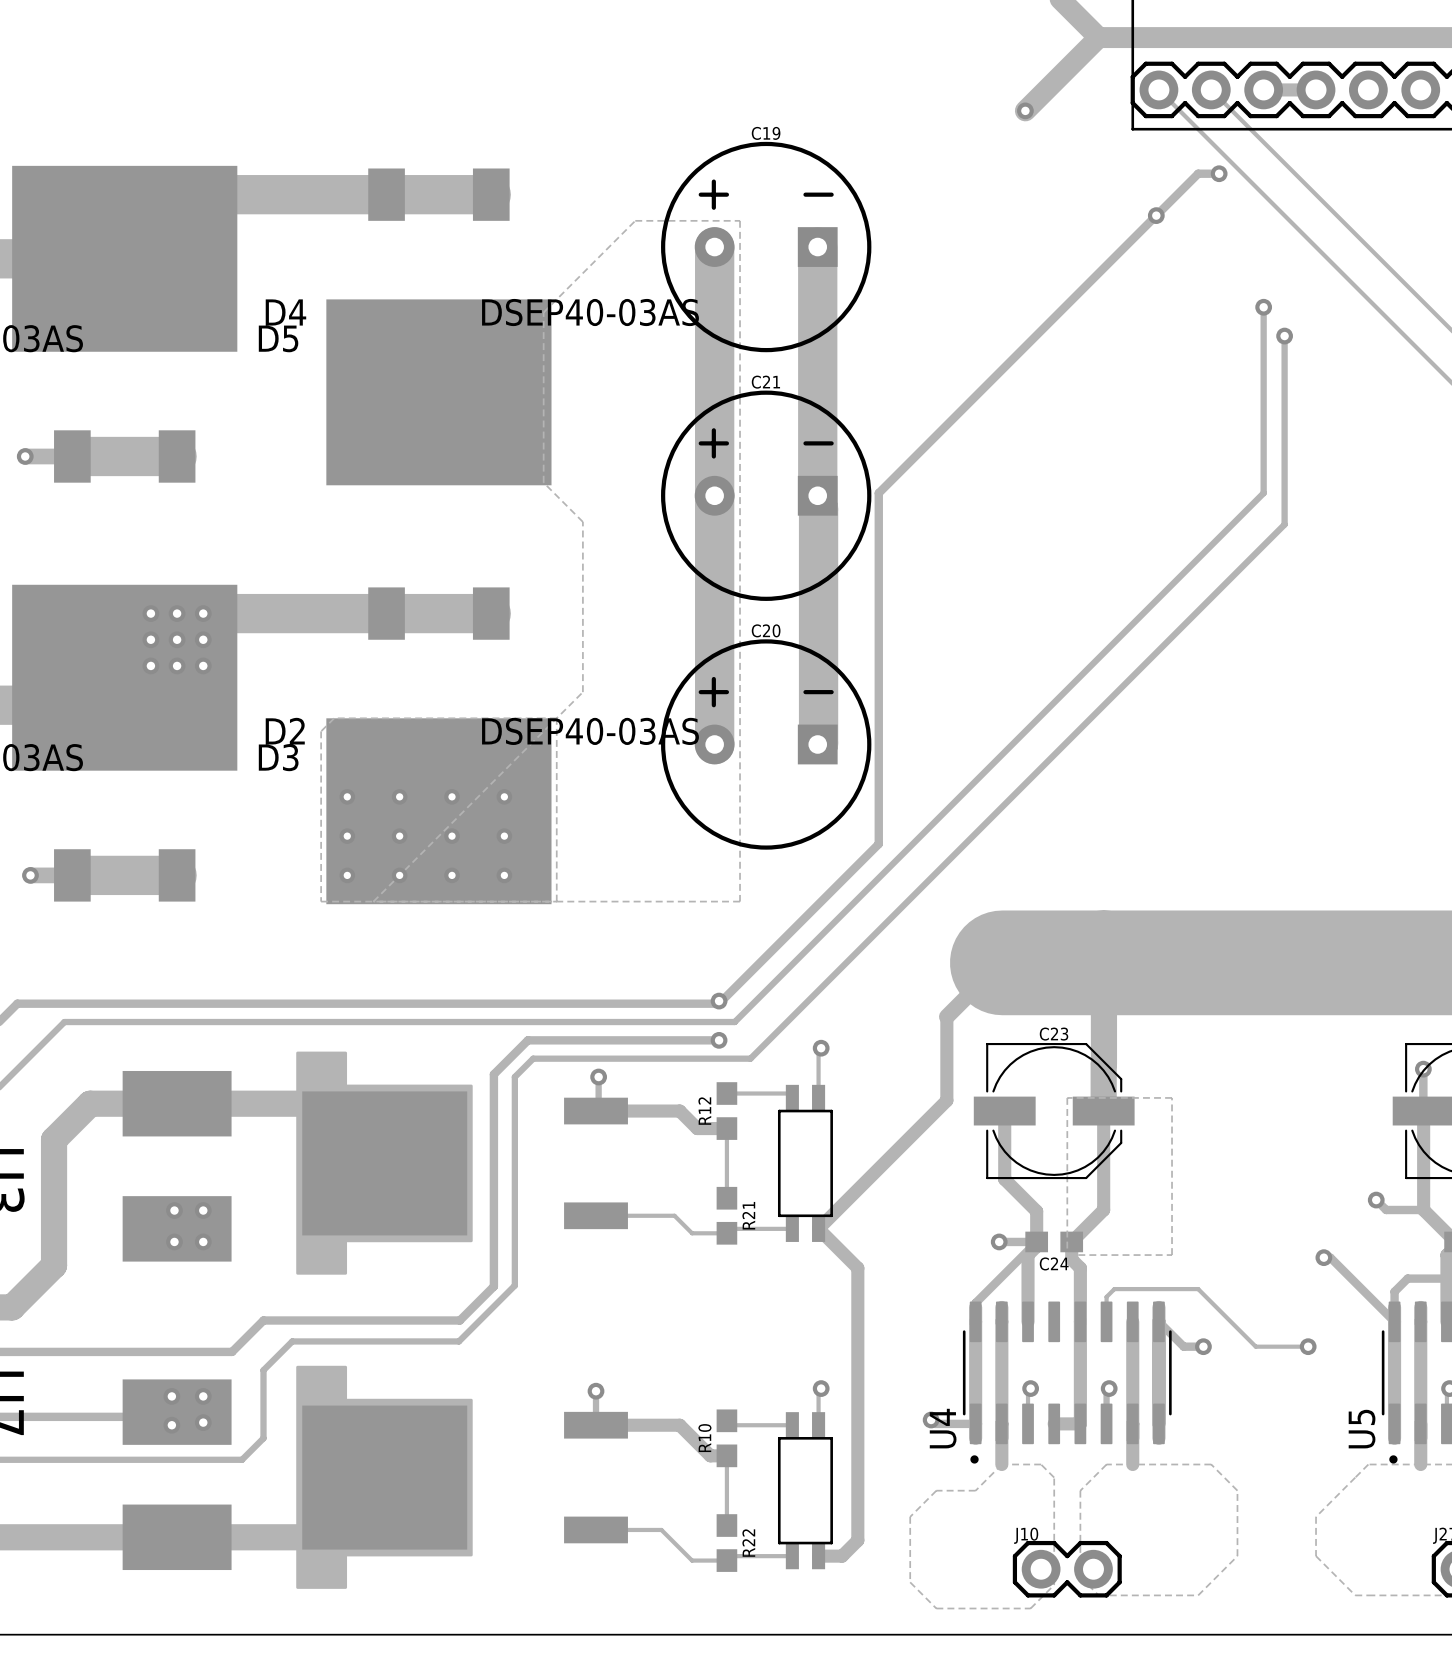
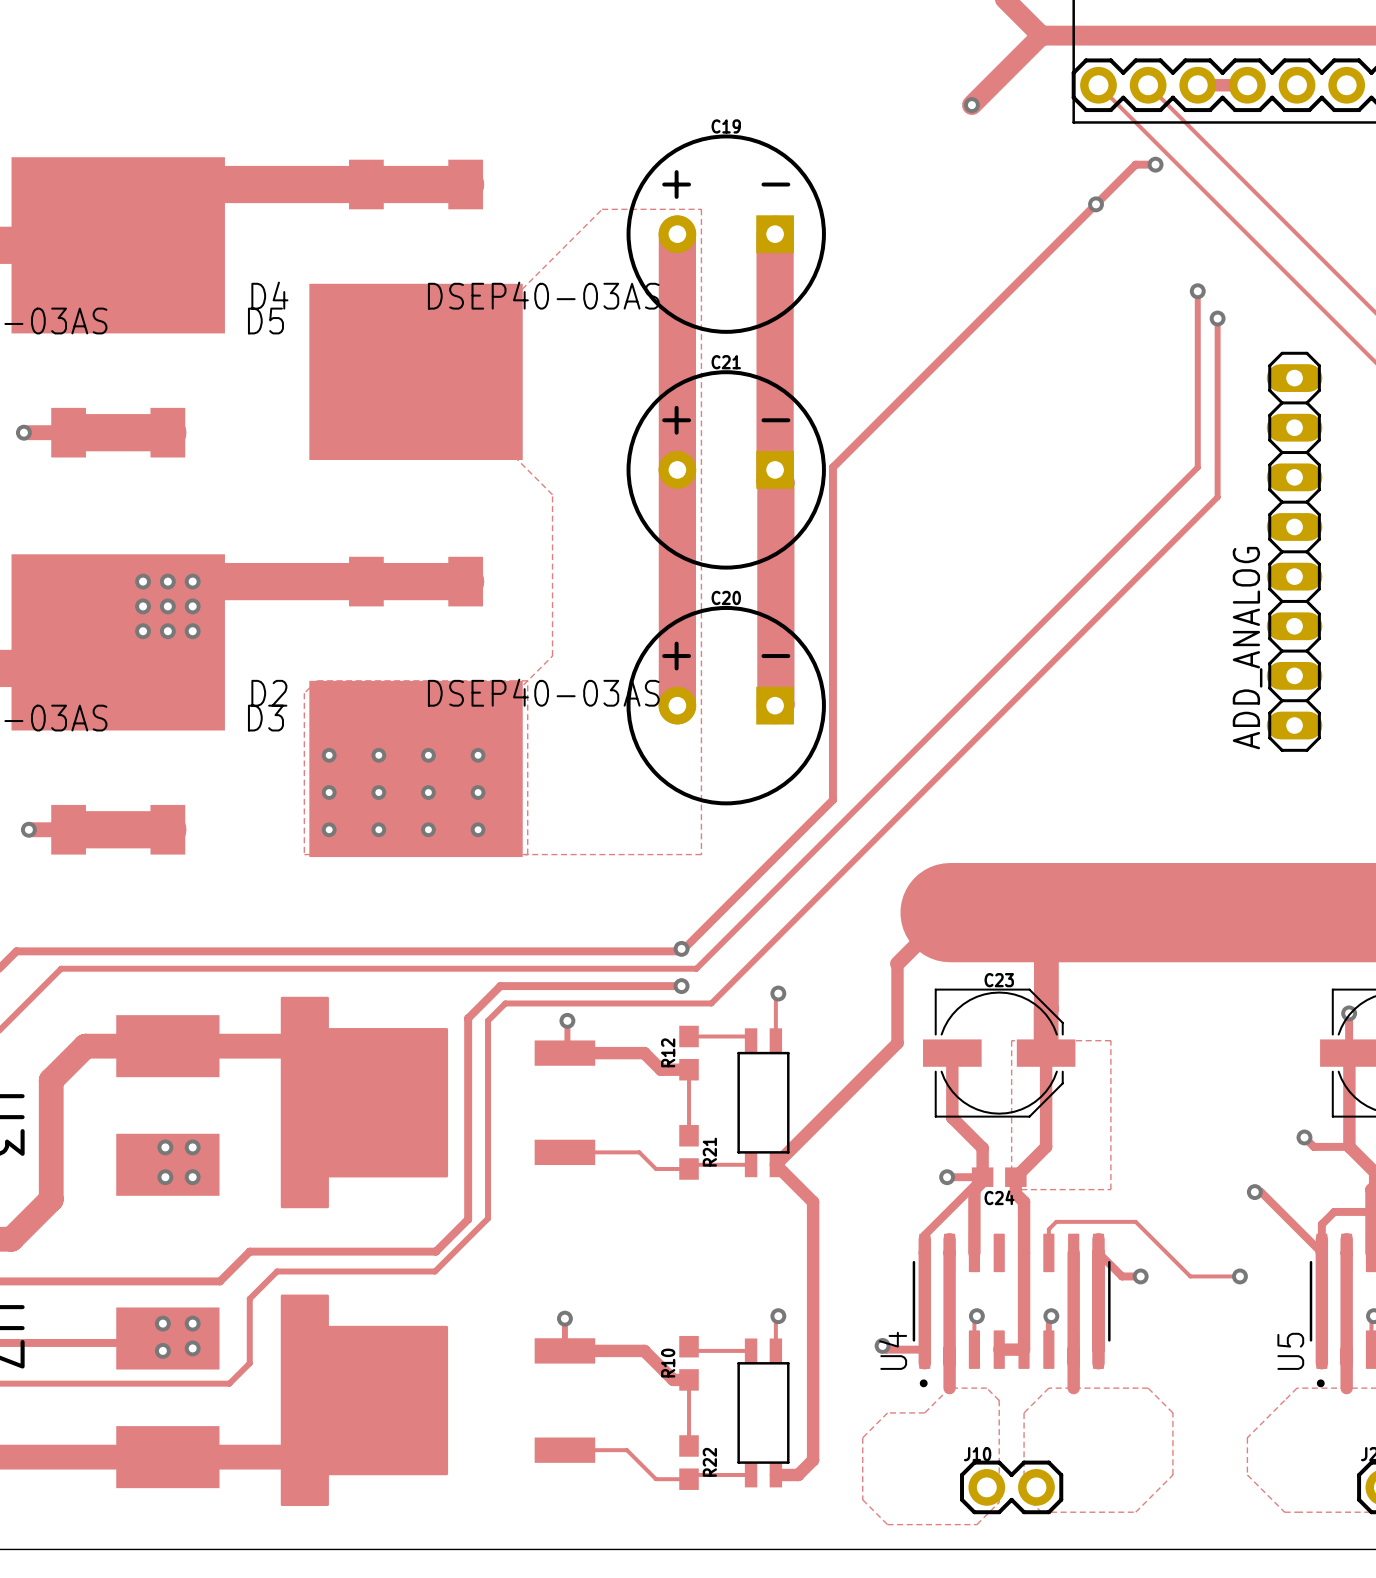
ADD_ANALOG: none -> (1294, 551)

